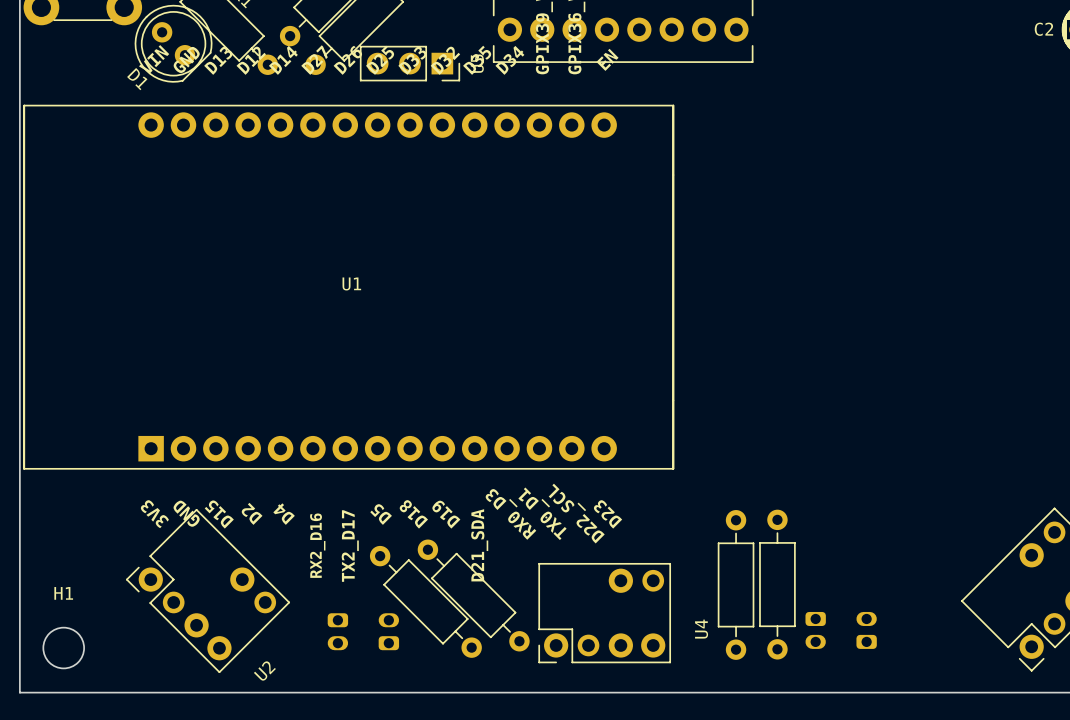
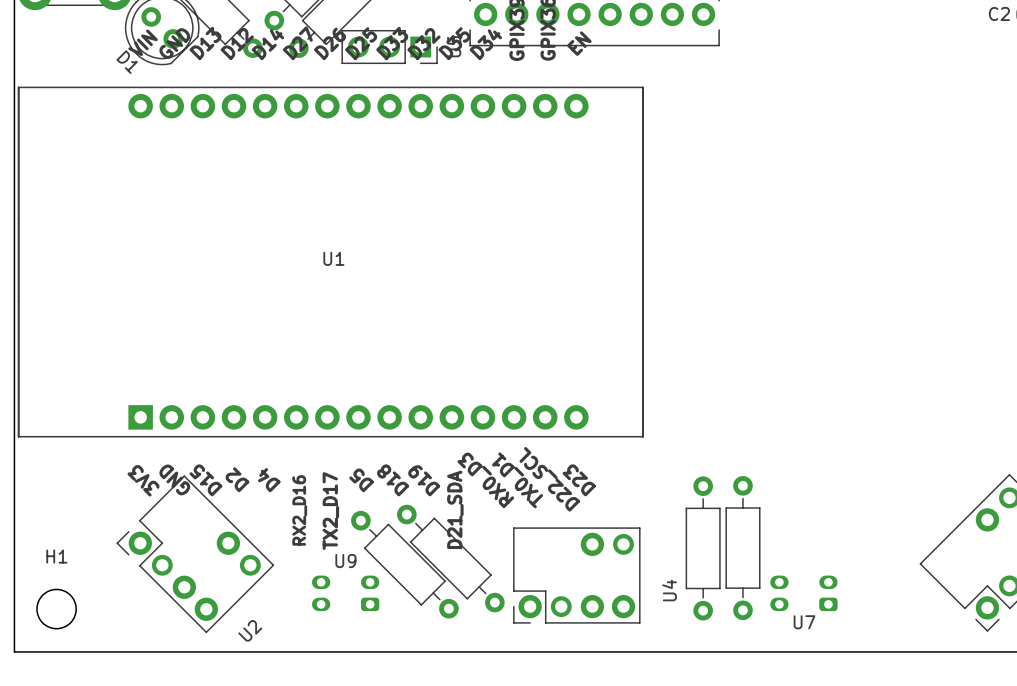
part: (841, 630) -> none
part: (363, 631) -> none
U9: none -> (345, 593)
U7: none -> (803, 593)

